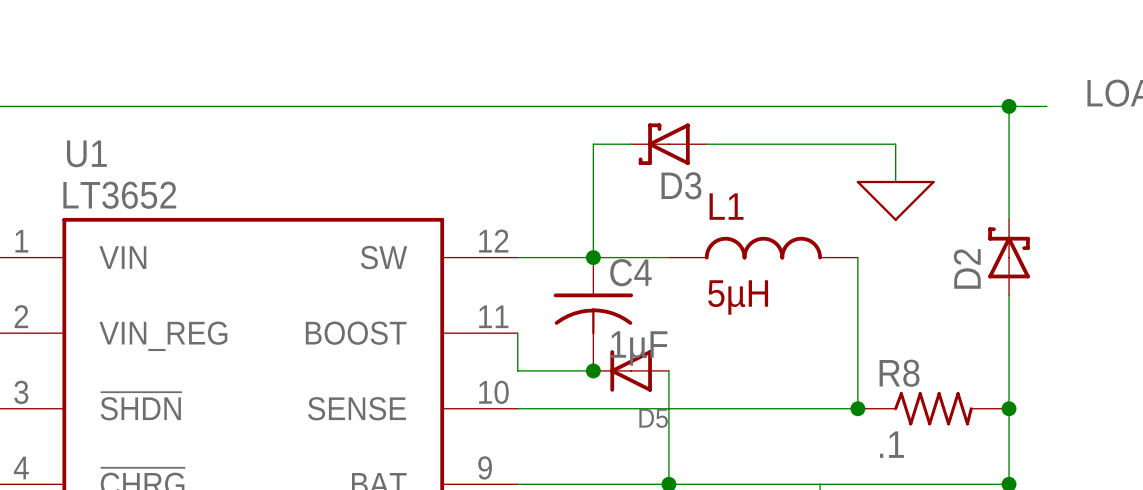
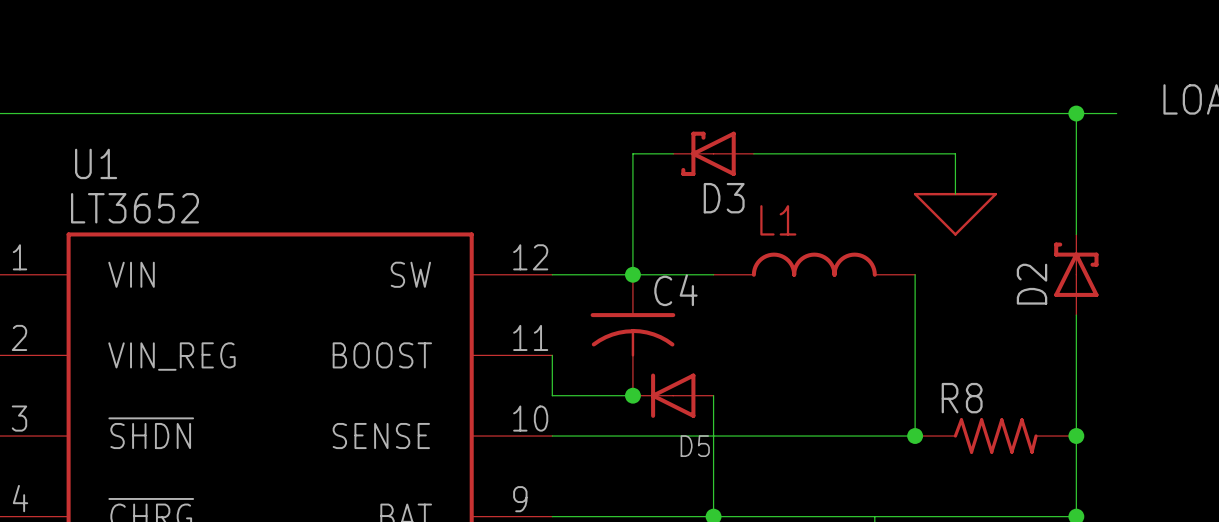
L1 value: 5µH (738, 297) -> none
C4 value: 1µF (639, 348) -> none
R8 value: .1 (891, 444) -> none

